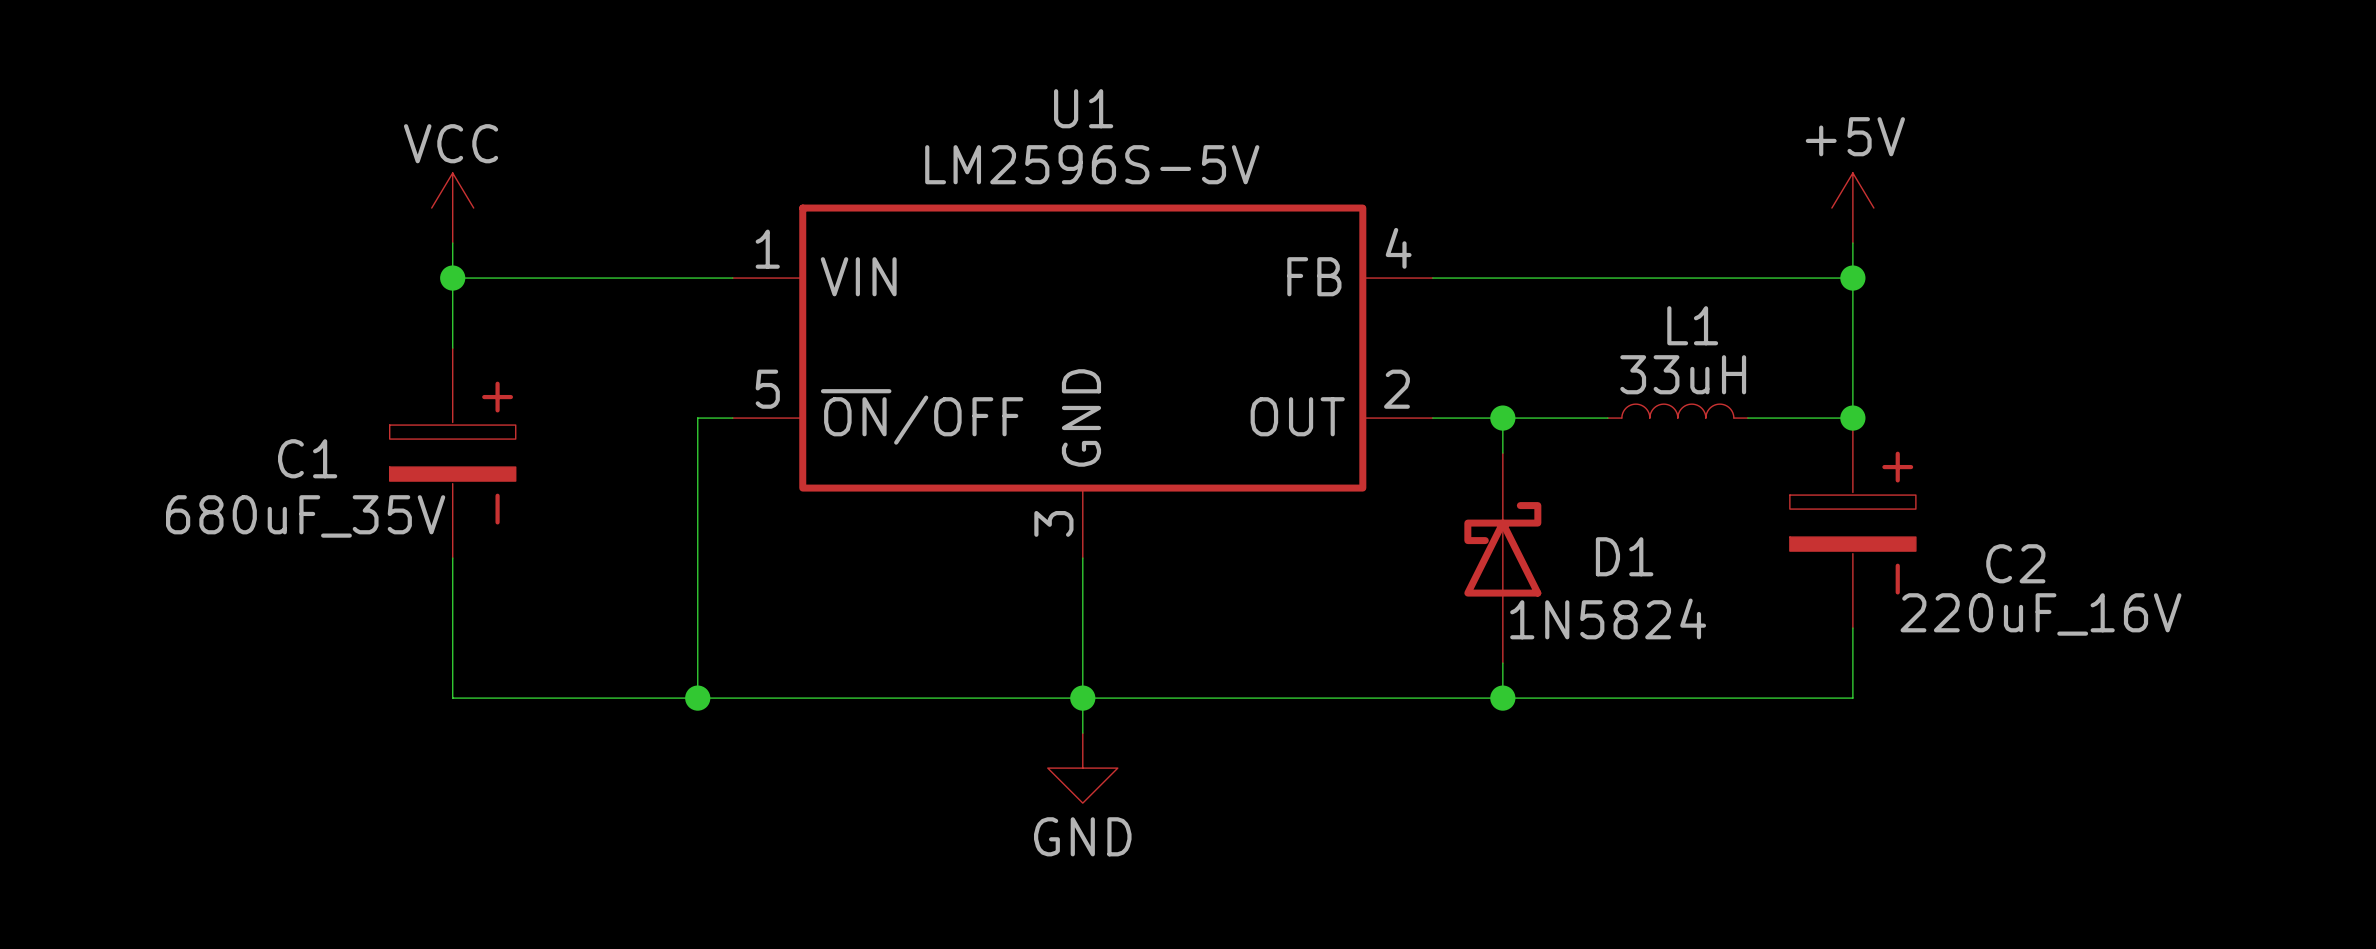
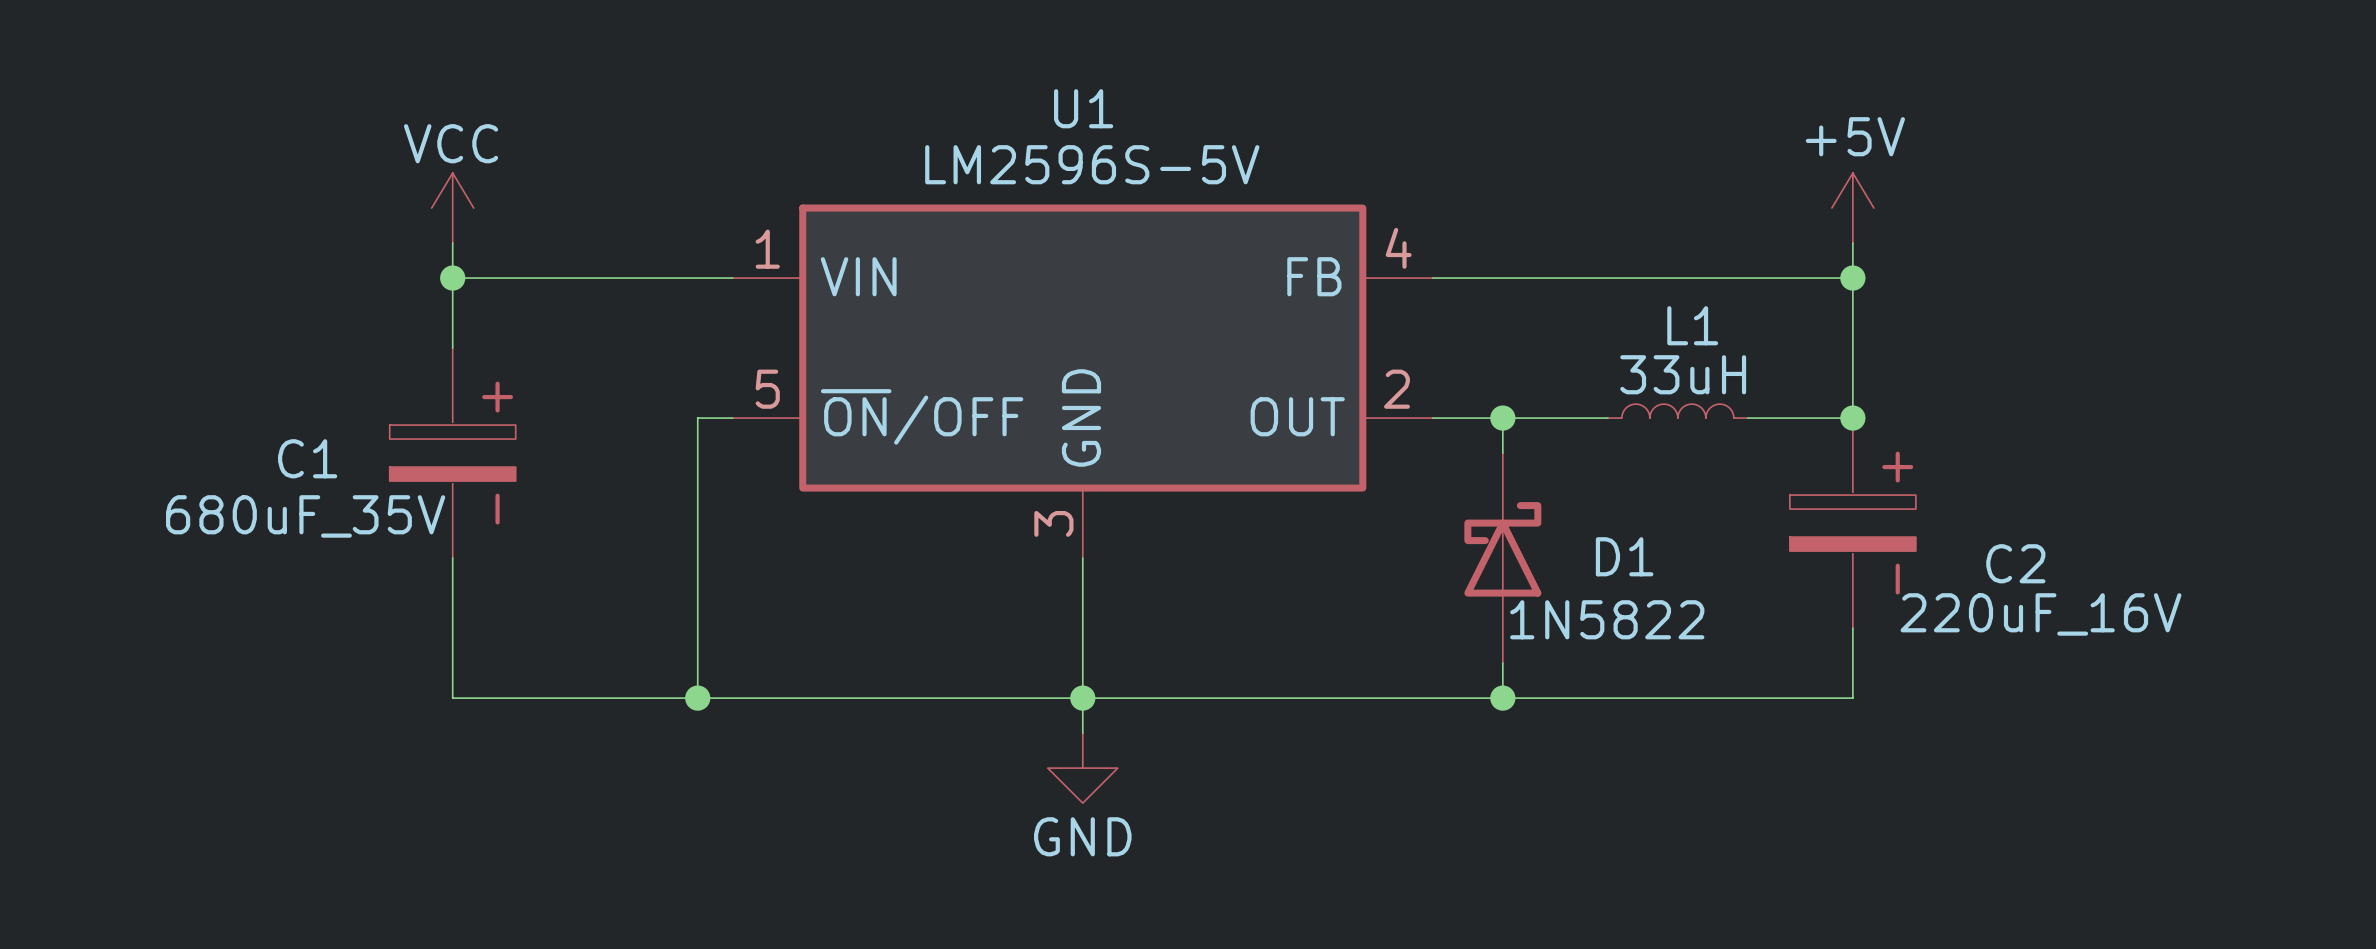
D1 value: 1N5824 (1608, 618) -> 1N5822 (1607, 619)

